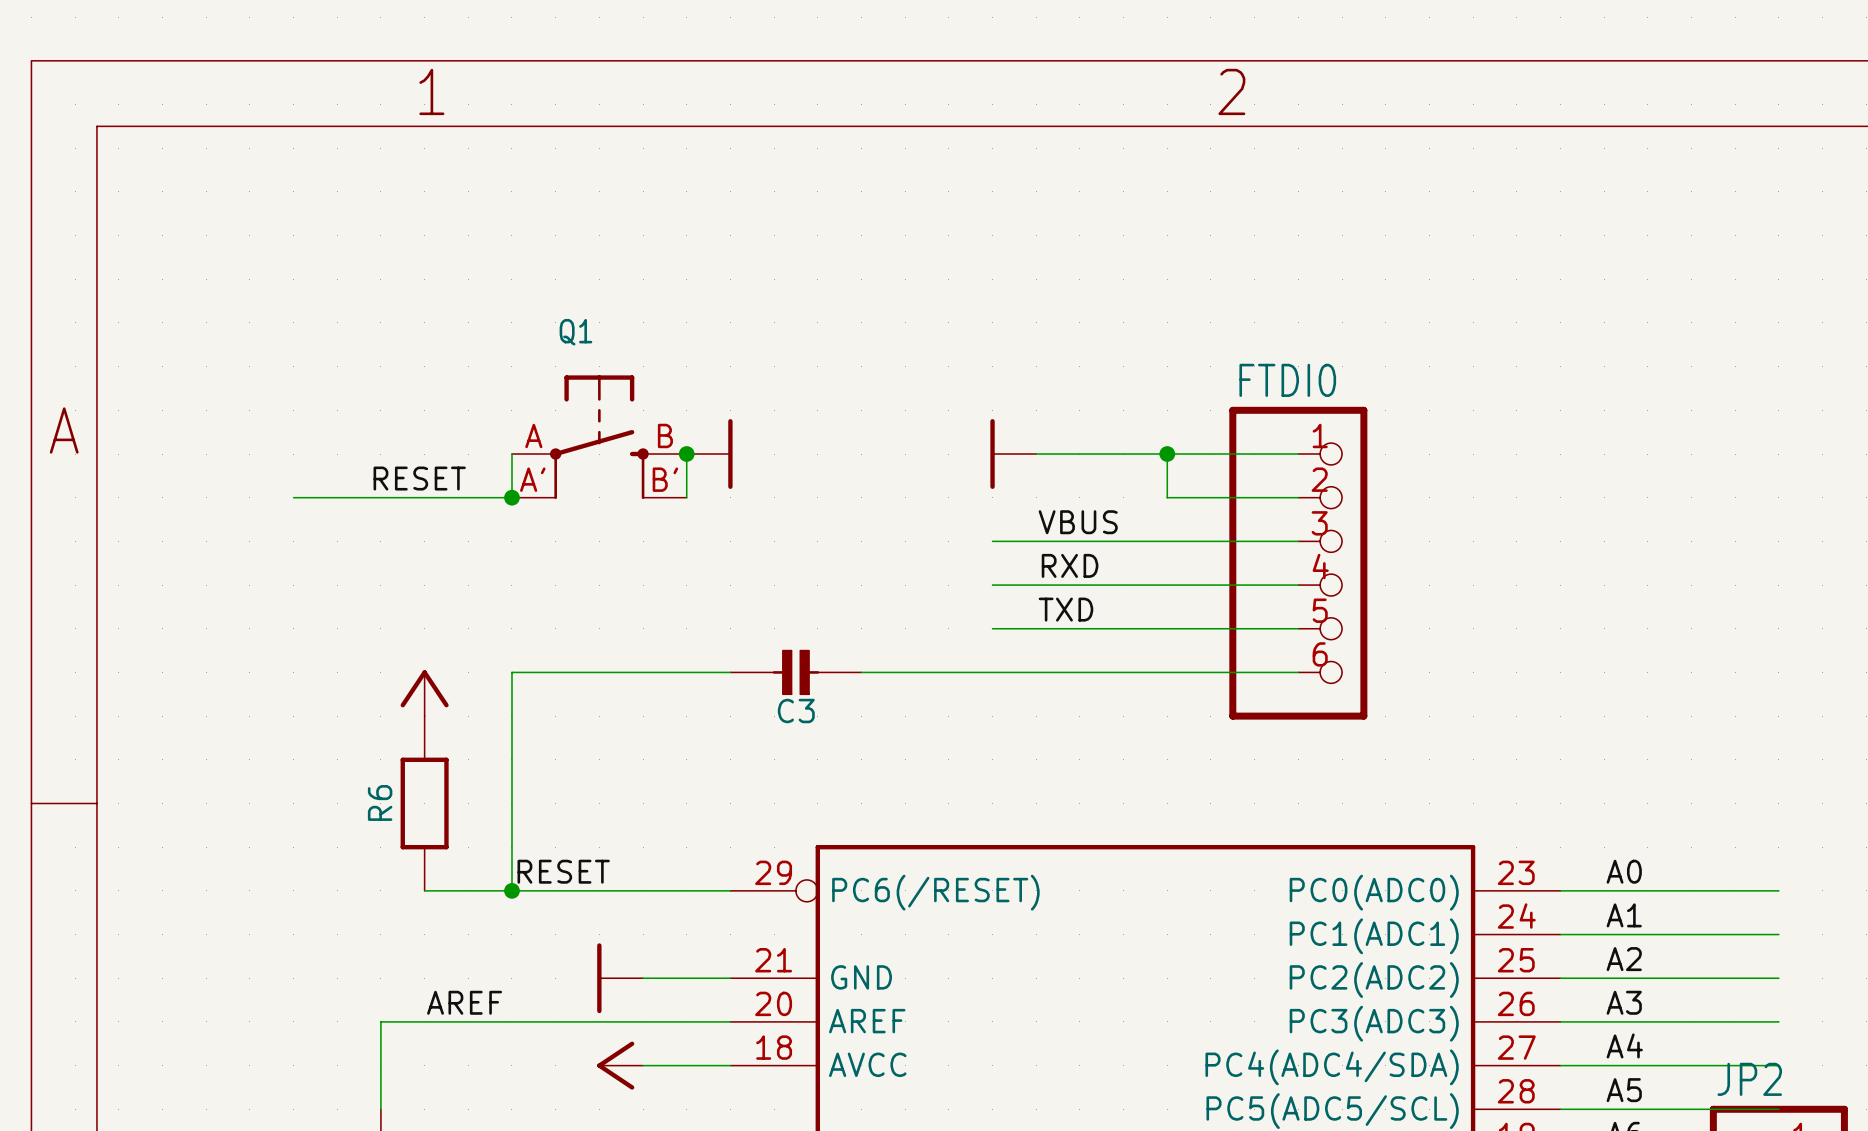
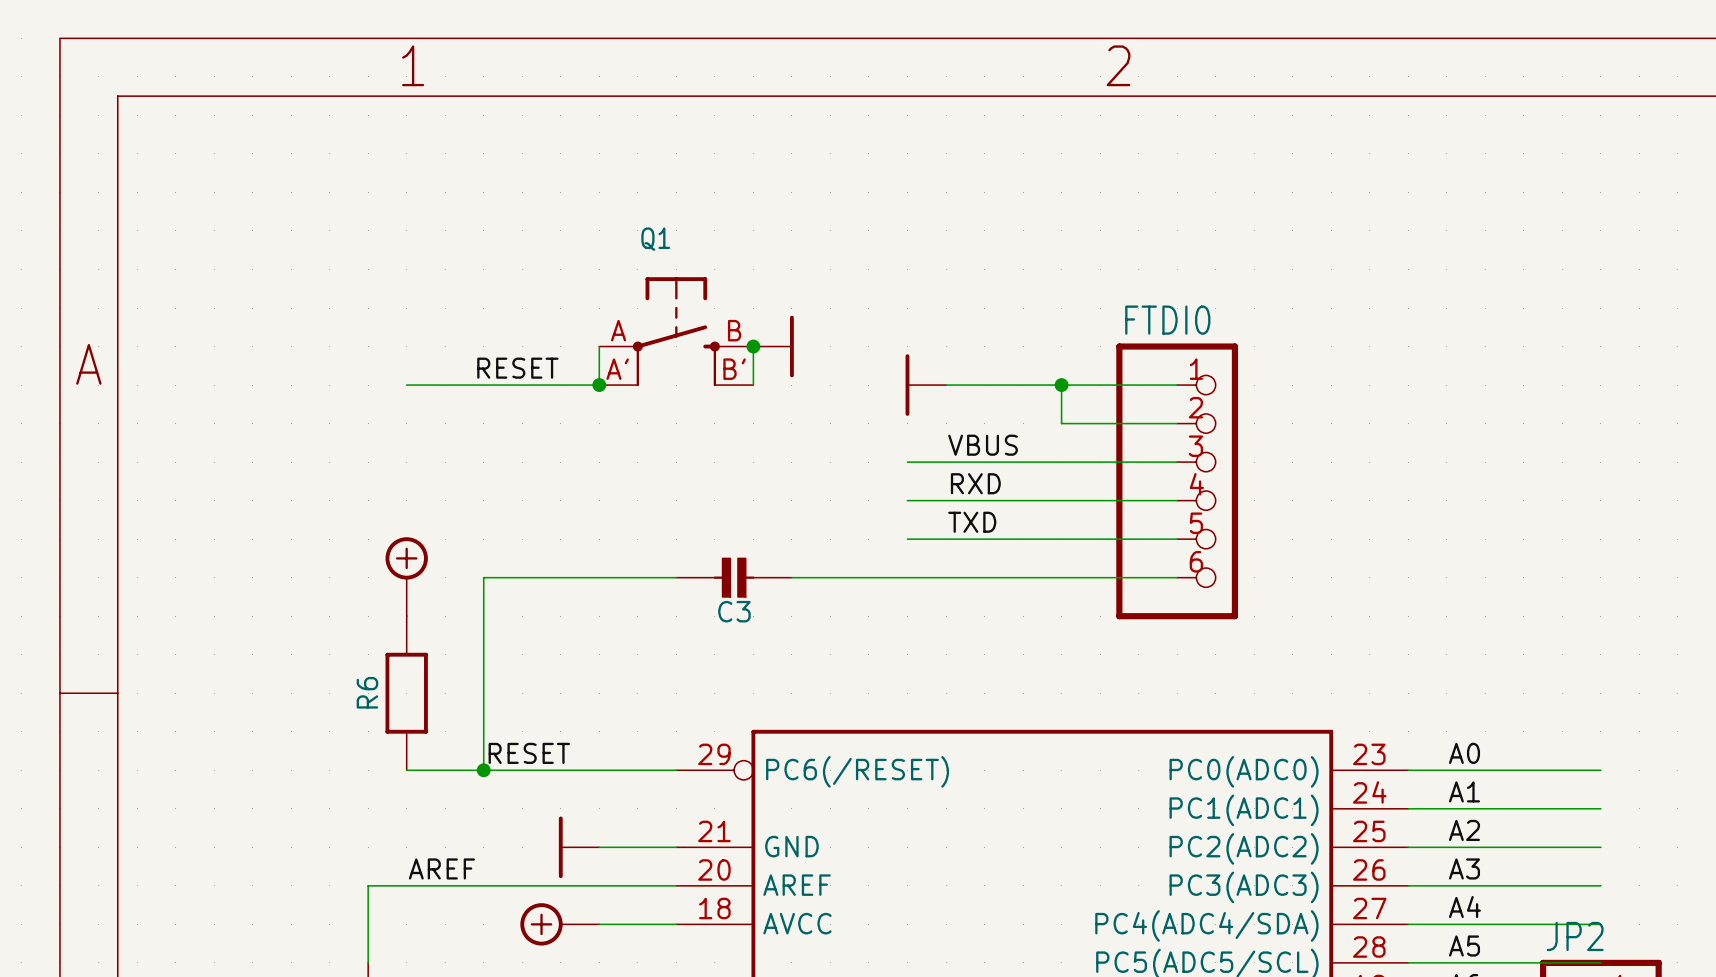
junction: none -> (753, 346)
Q1 position: (599, 437) -> (676, 331)
wire: (511, 454) (511, 497) (293, 497) -> (599, 346) (599, 385) (406, 385)
wire: (686, 454) (686, 497) -> (753, 346) (753, 385)
junction position: (686, 454) -> (599, 385)
power symbol position: (709, 454) -> (773, 346)
label position: RESET (419, 478) -> RESET (517, 368)
junction: (511, 497) -> none
power symbol: none -> (406, 576)
power symbol: (424, 693) -> none
power symbol: none -> (559, 924)
power symbol: (620, 1065) -> none

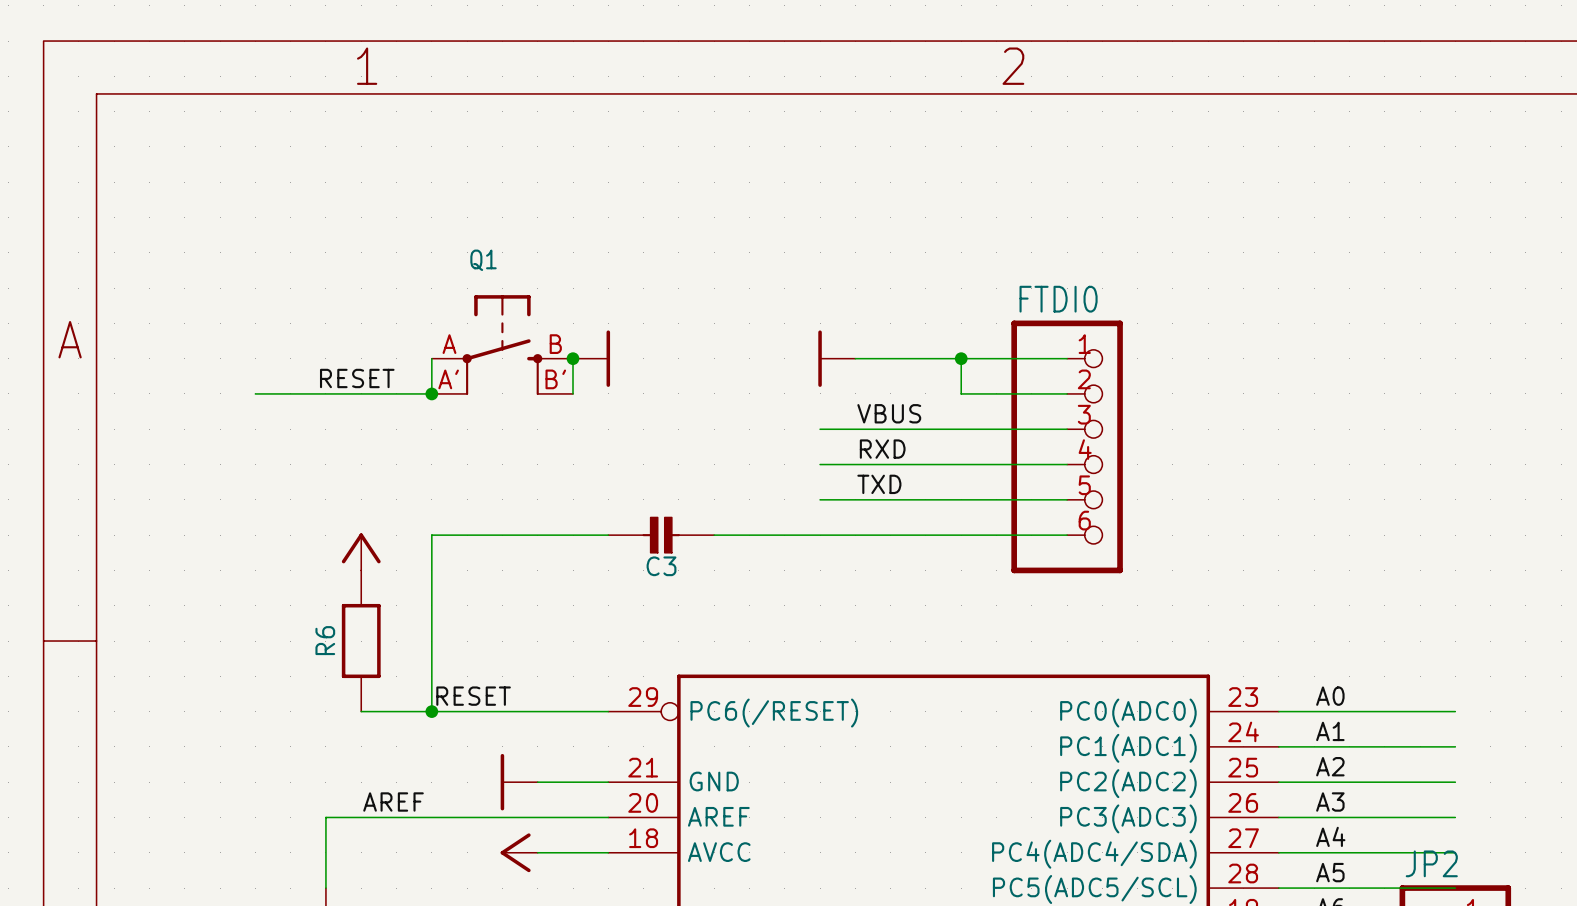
Q1 position: (676, 331) -> (502, 345)
wire: (599, 346) (599, 385) (406, 385) -> (431, 358) (431, 393) (255, 393)
wire: (753, 346) (753, 385) -> (573, 358) (573, 393)
junction: (753, 346) -> none
power symbol position: (773, 346) -> (591, 358)
label position: RESET (517, 368) -> RESET (357, 378)
junction position: (599, 385) -> (573, 358)
junction: none -> (431, 393)
power symbol: (406, 576) -> none
power symbol: none -> (361, 551)
power symbol: (559, 924) -> none
power symbol: none -> (519, 852)

